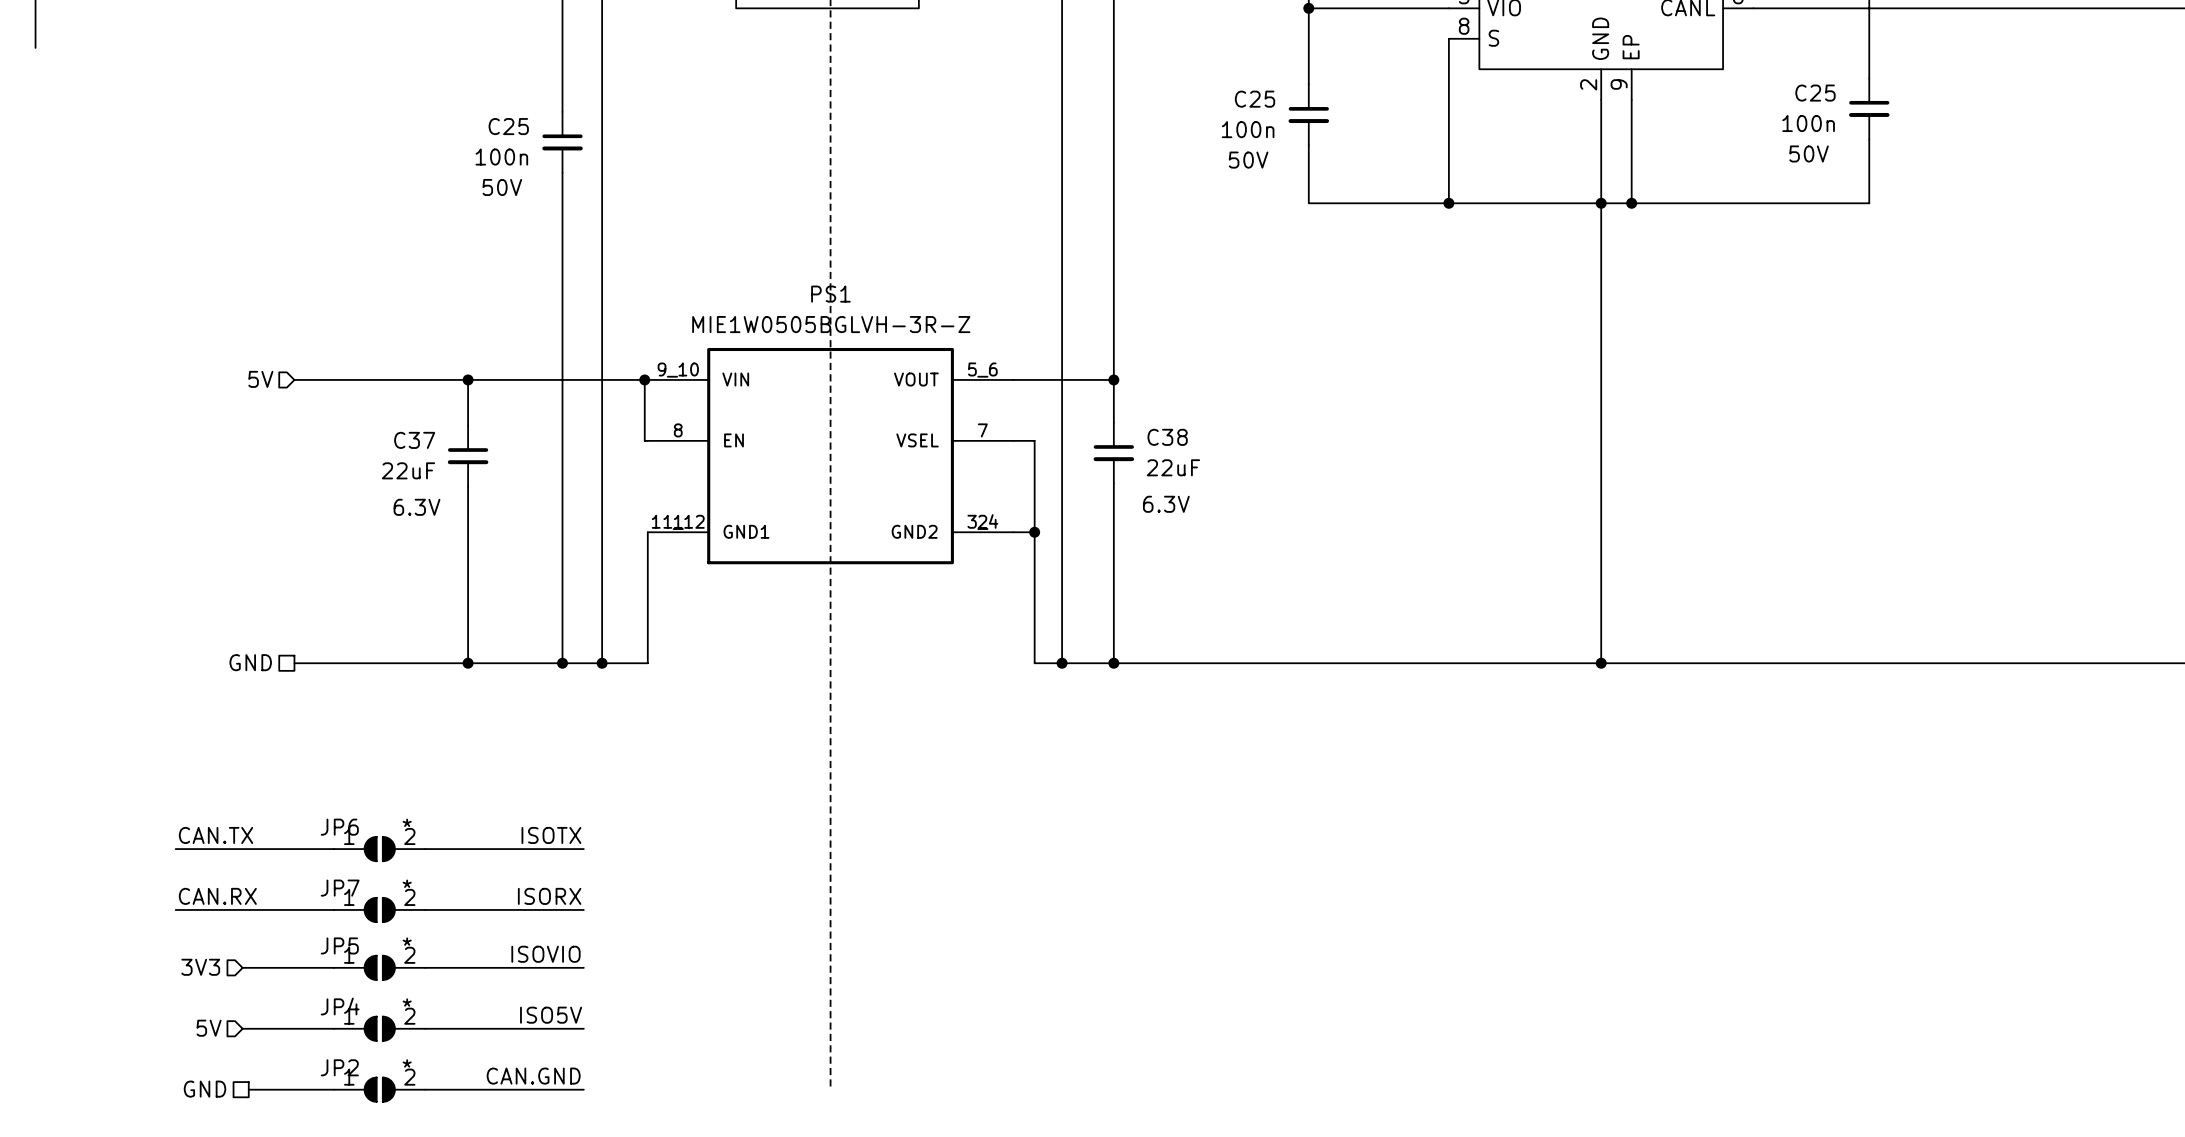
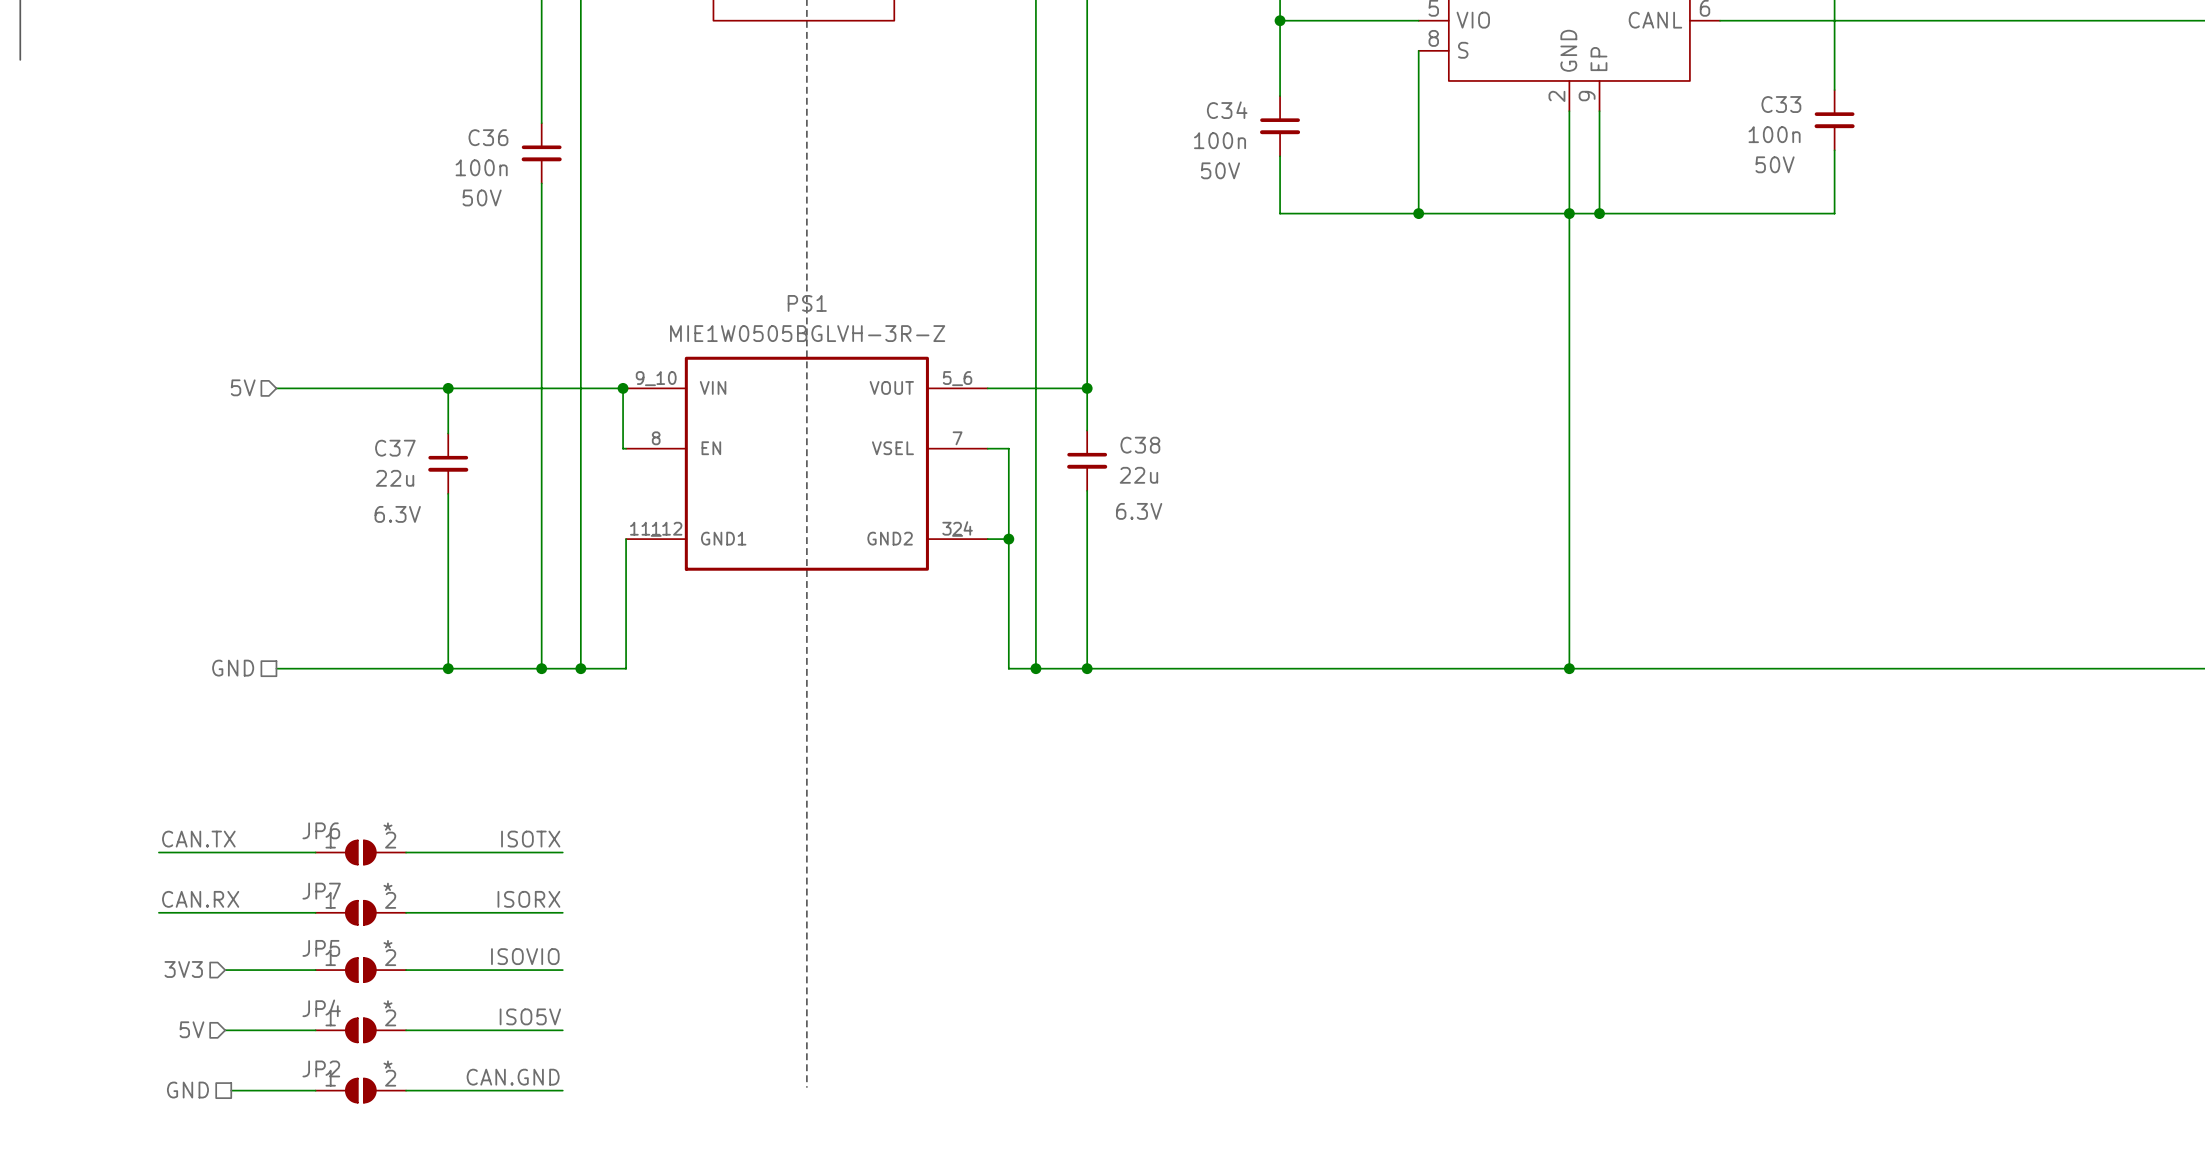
C25 name: C25 (1815, 93) -> C33 (1781, 104)
C25 name: C25 (1255, 99) -> C34 (1227, 110)
C25 name: C25 (508, 126) -> C36 (488, 137)
C38 value: 22uF (1173, 467) -> 22u (1138, 475)
C37 value: 22uF (408, 470) -> 22u (395, 478)

